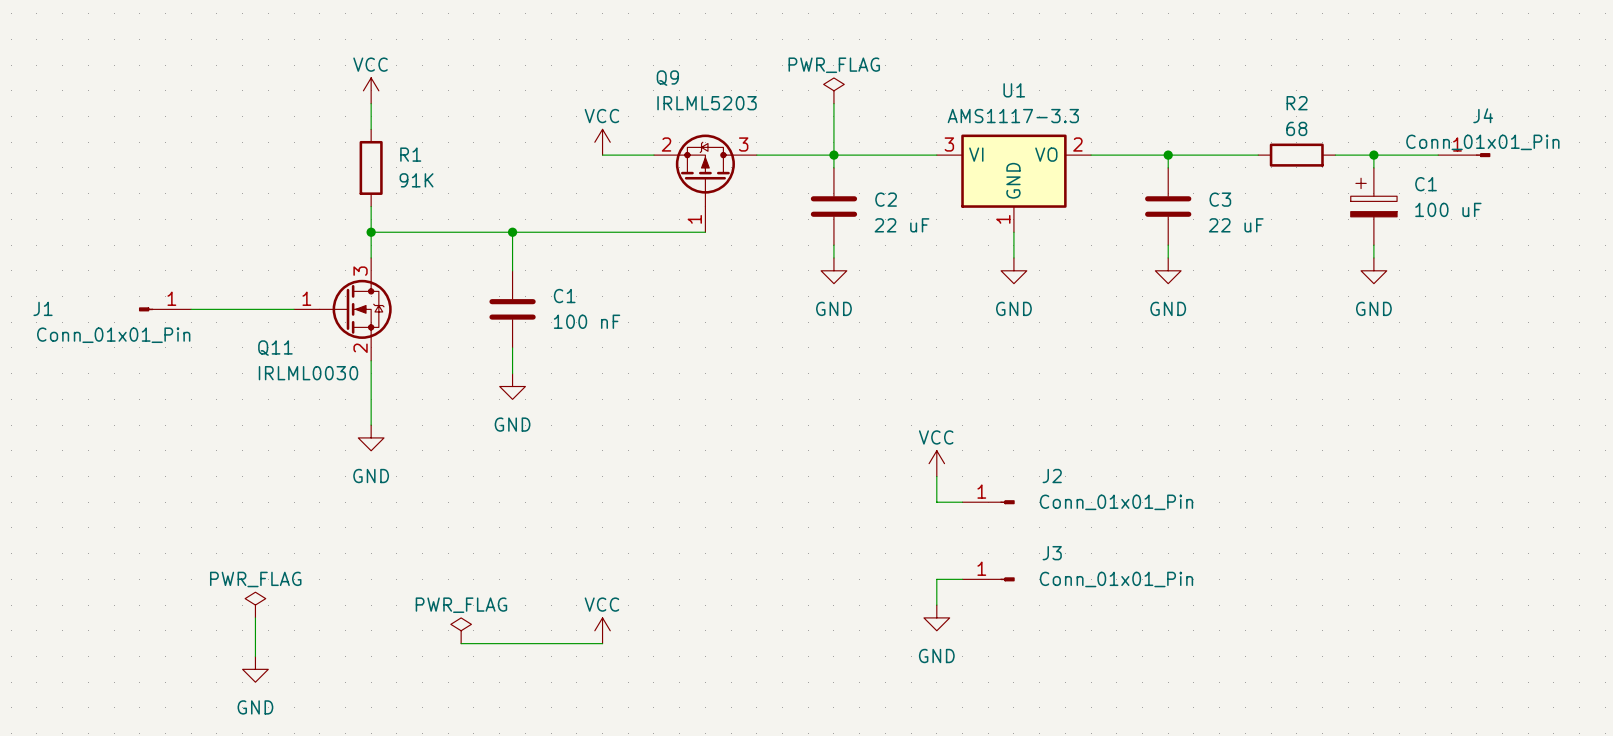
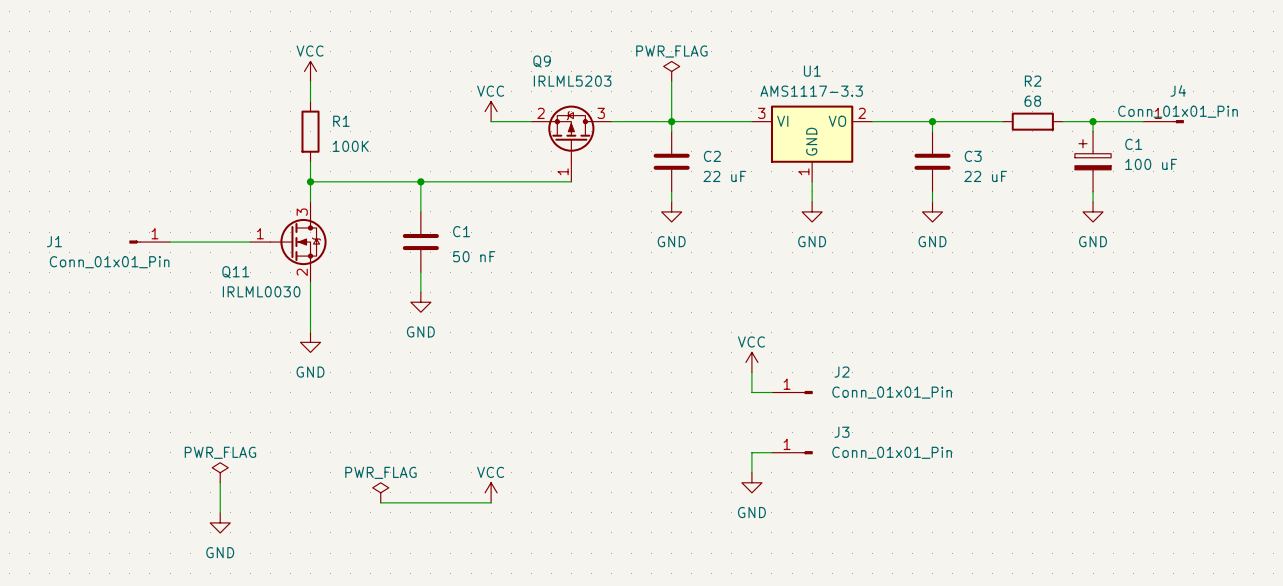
R1 value: 91K (416, 180) -> 100K (350, 146)
C1 value: 100 nF (587, 321) -> 50 nF (474, 256)

